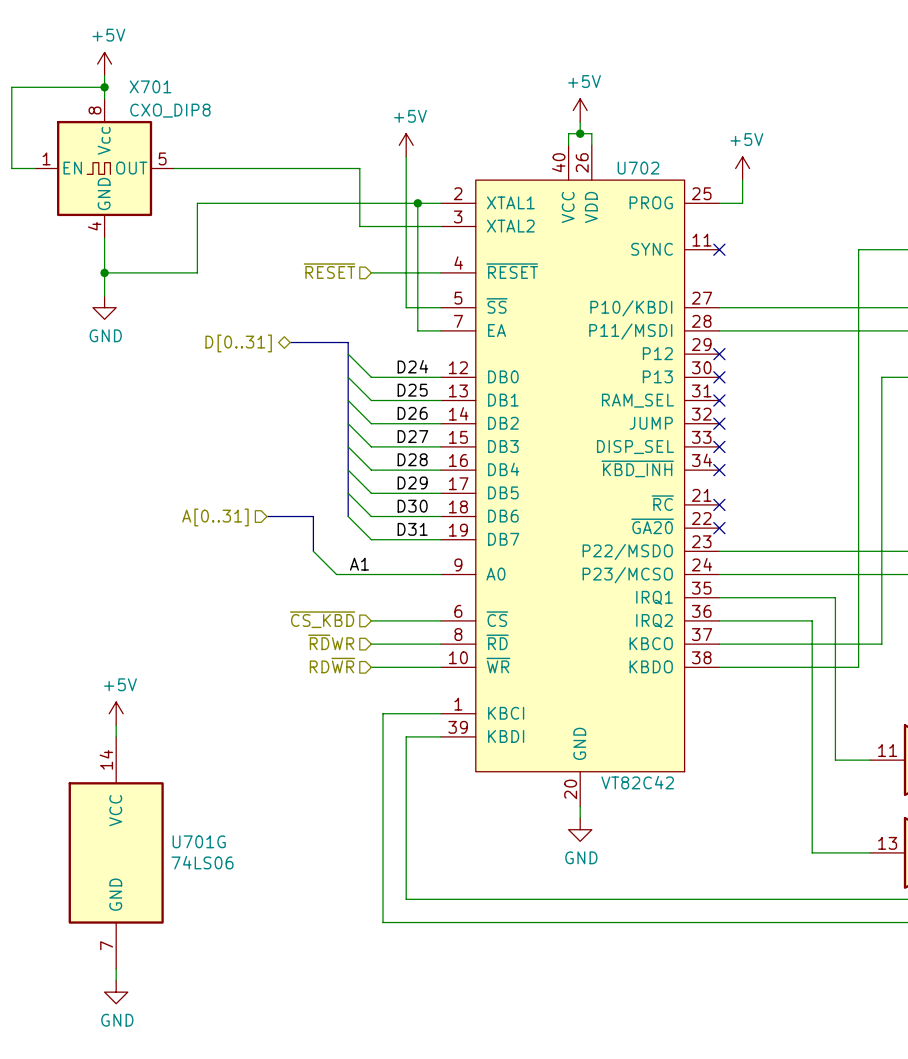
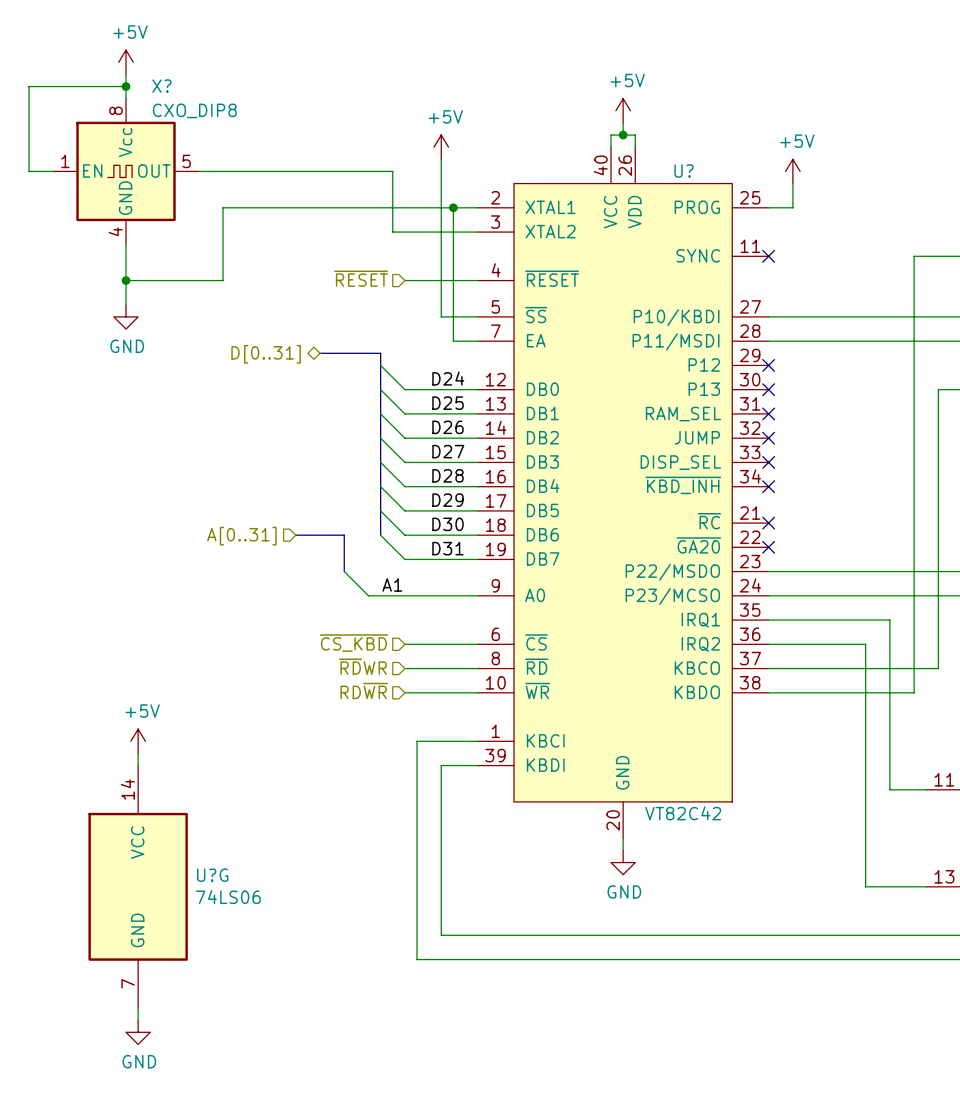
X701 name: X701 (150, 86) -> X? (161, 86)
U702 name: U702 (638, 168) -> U? (684, 170)
U701G name: U701G (199, 841) -> U?G (212, 875)

